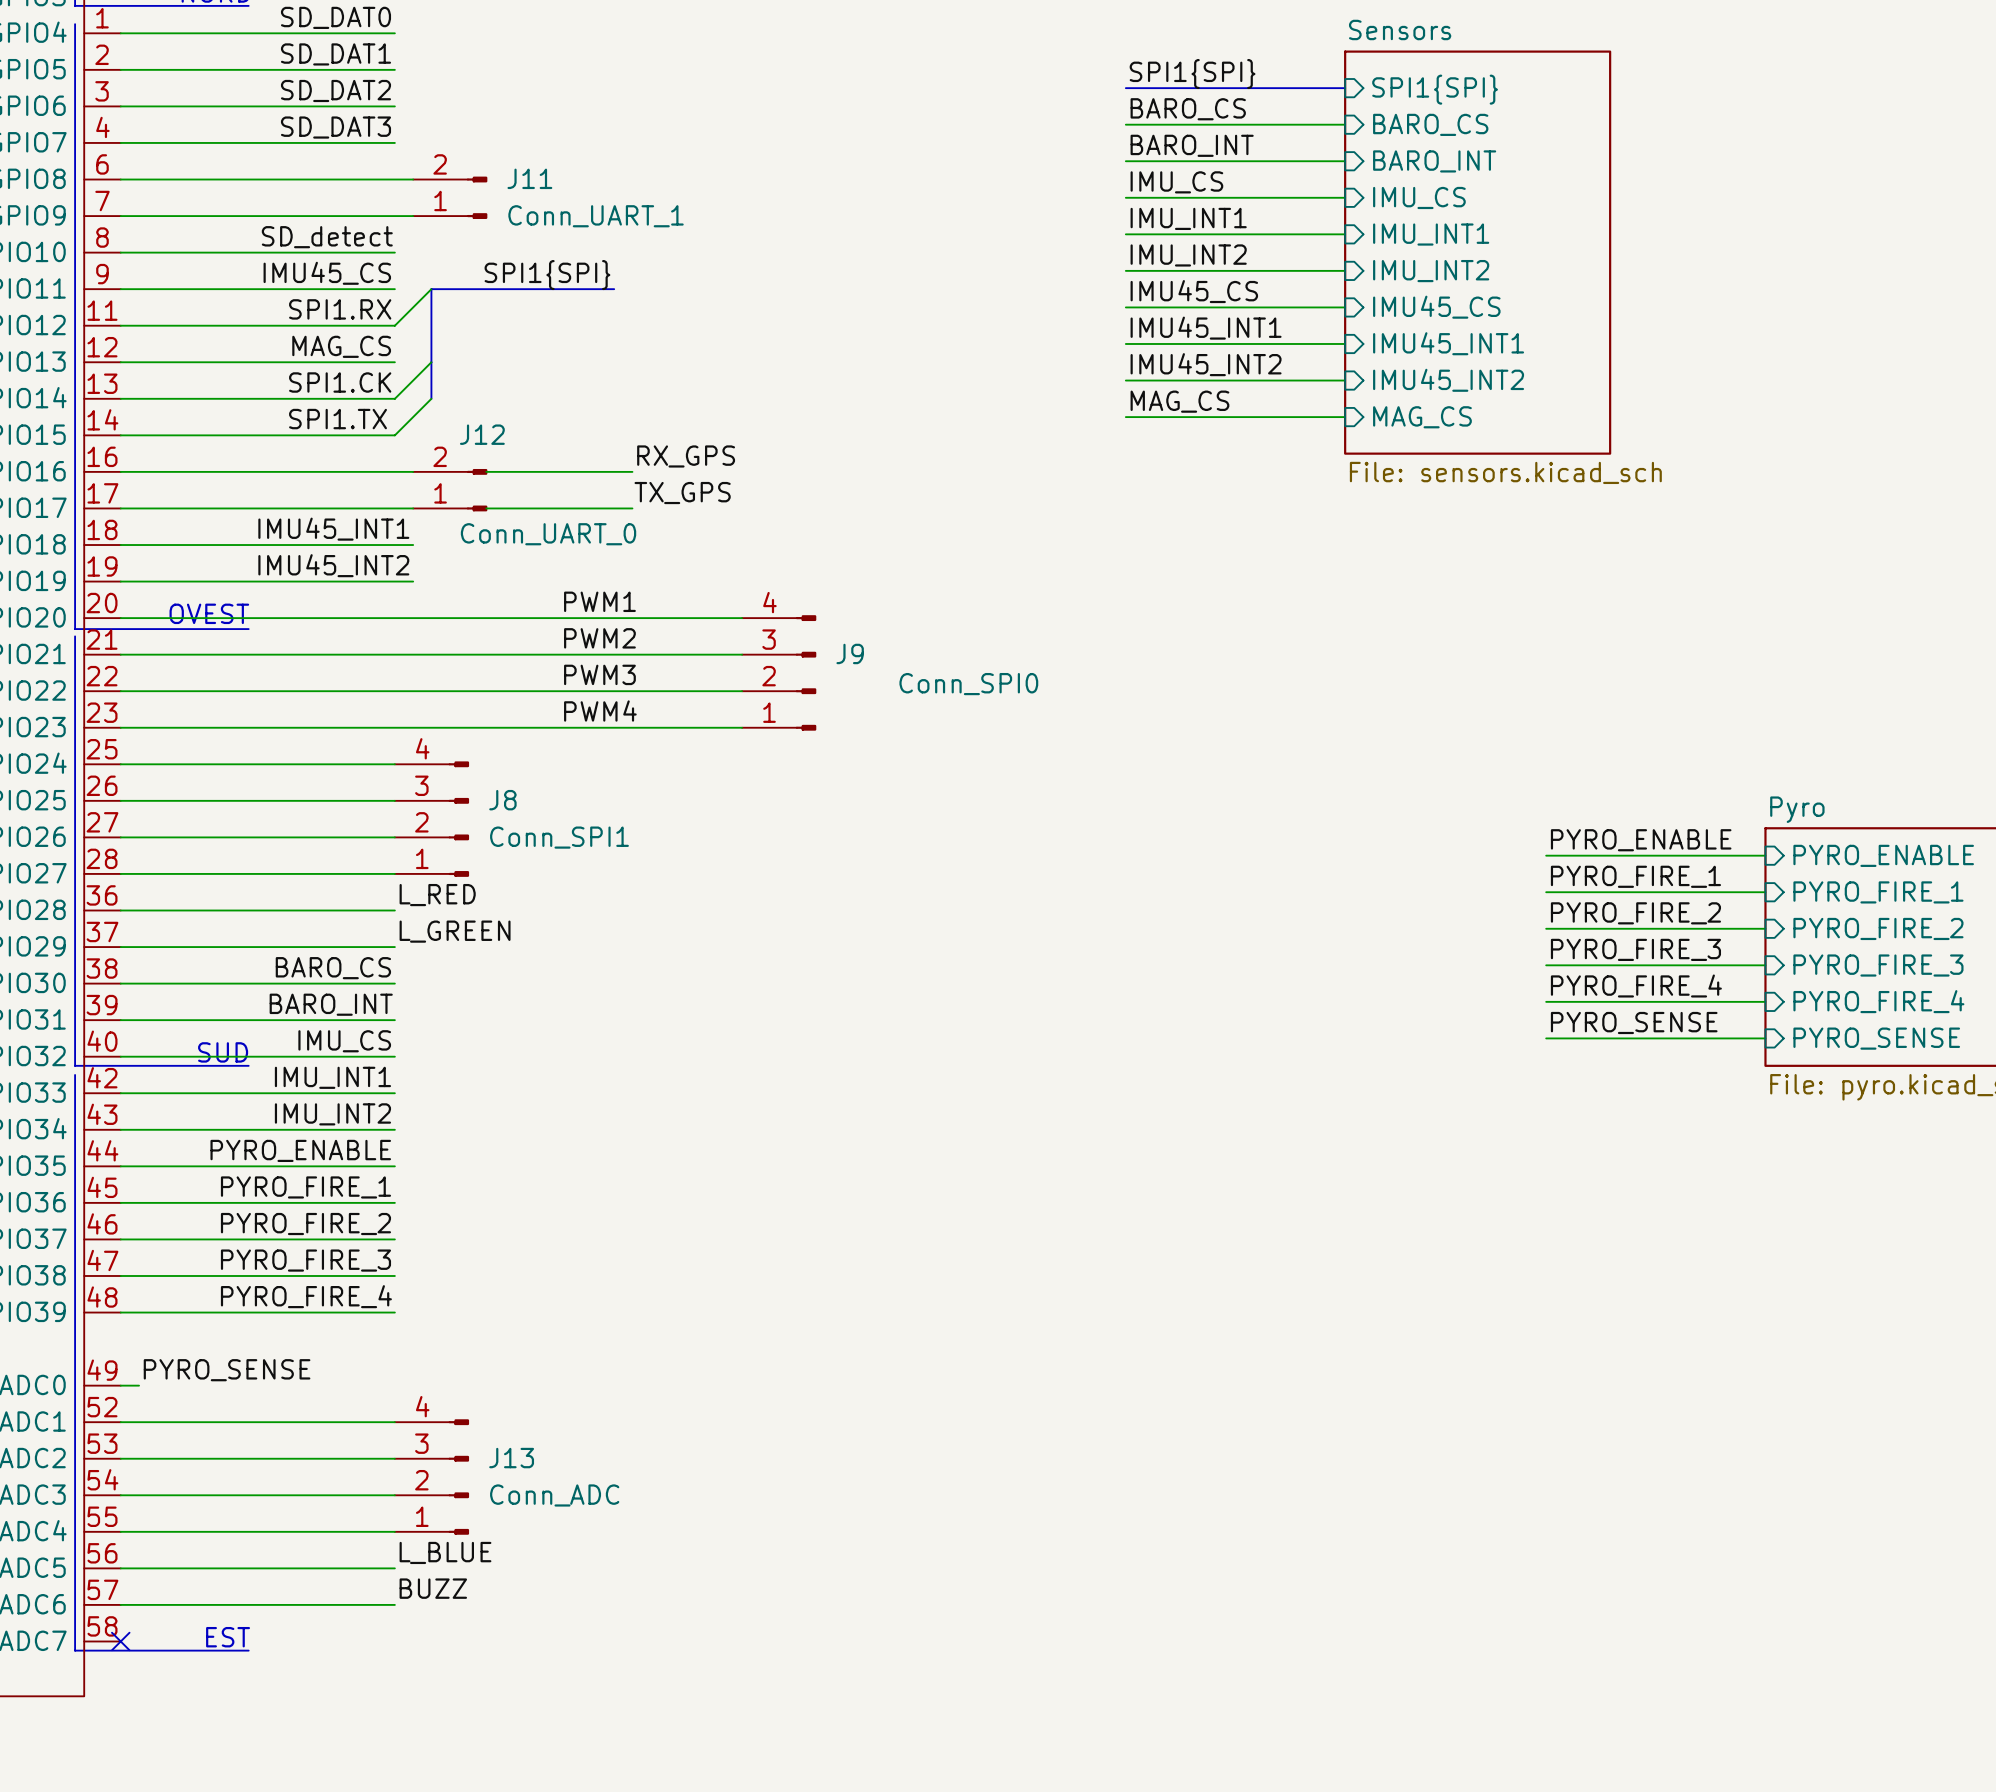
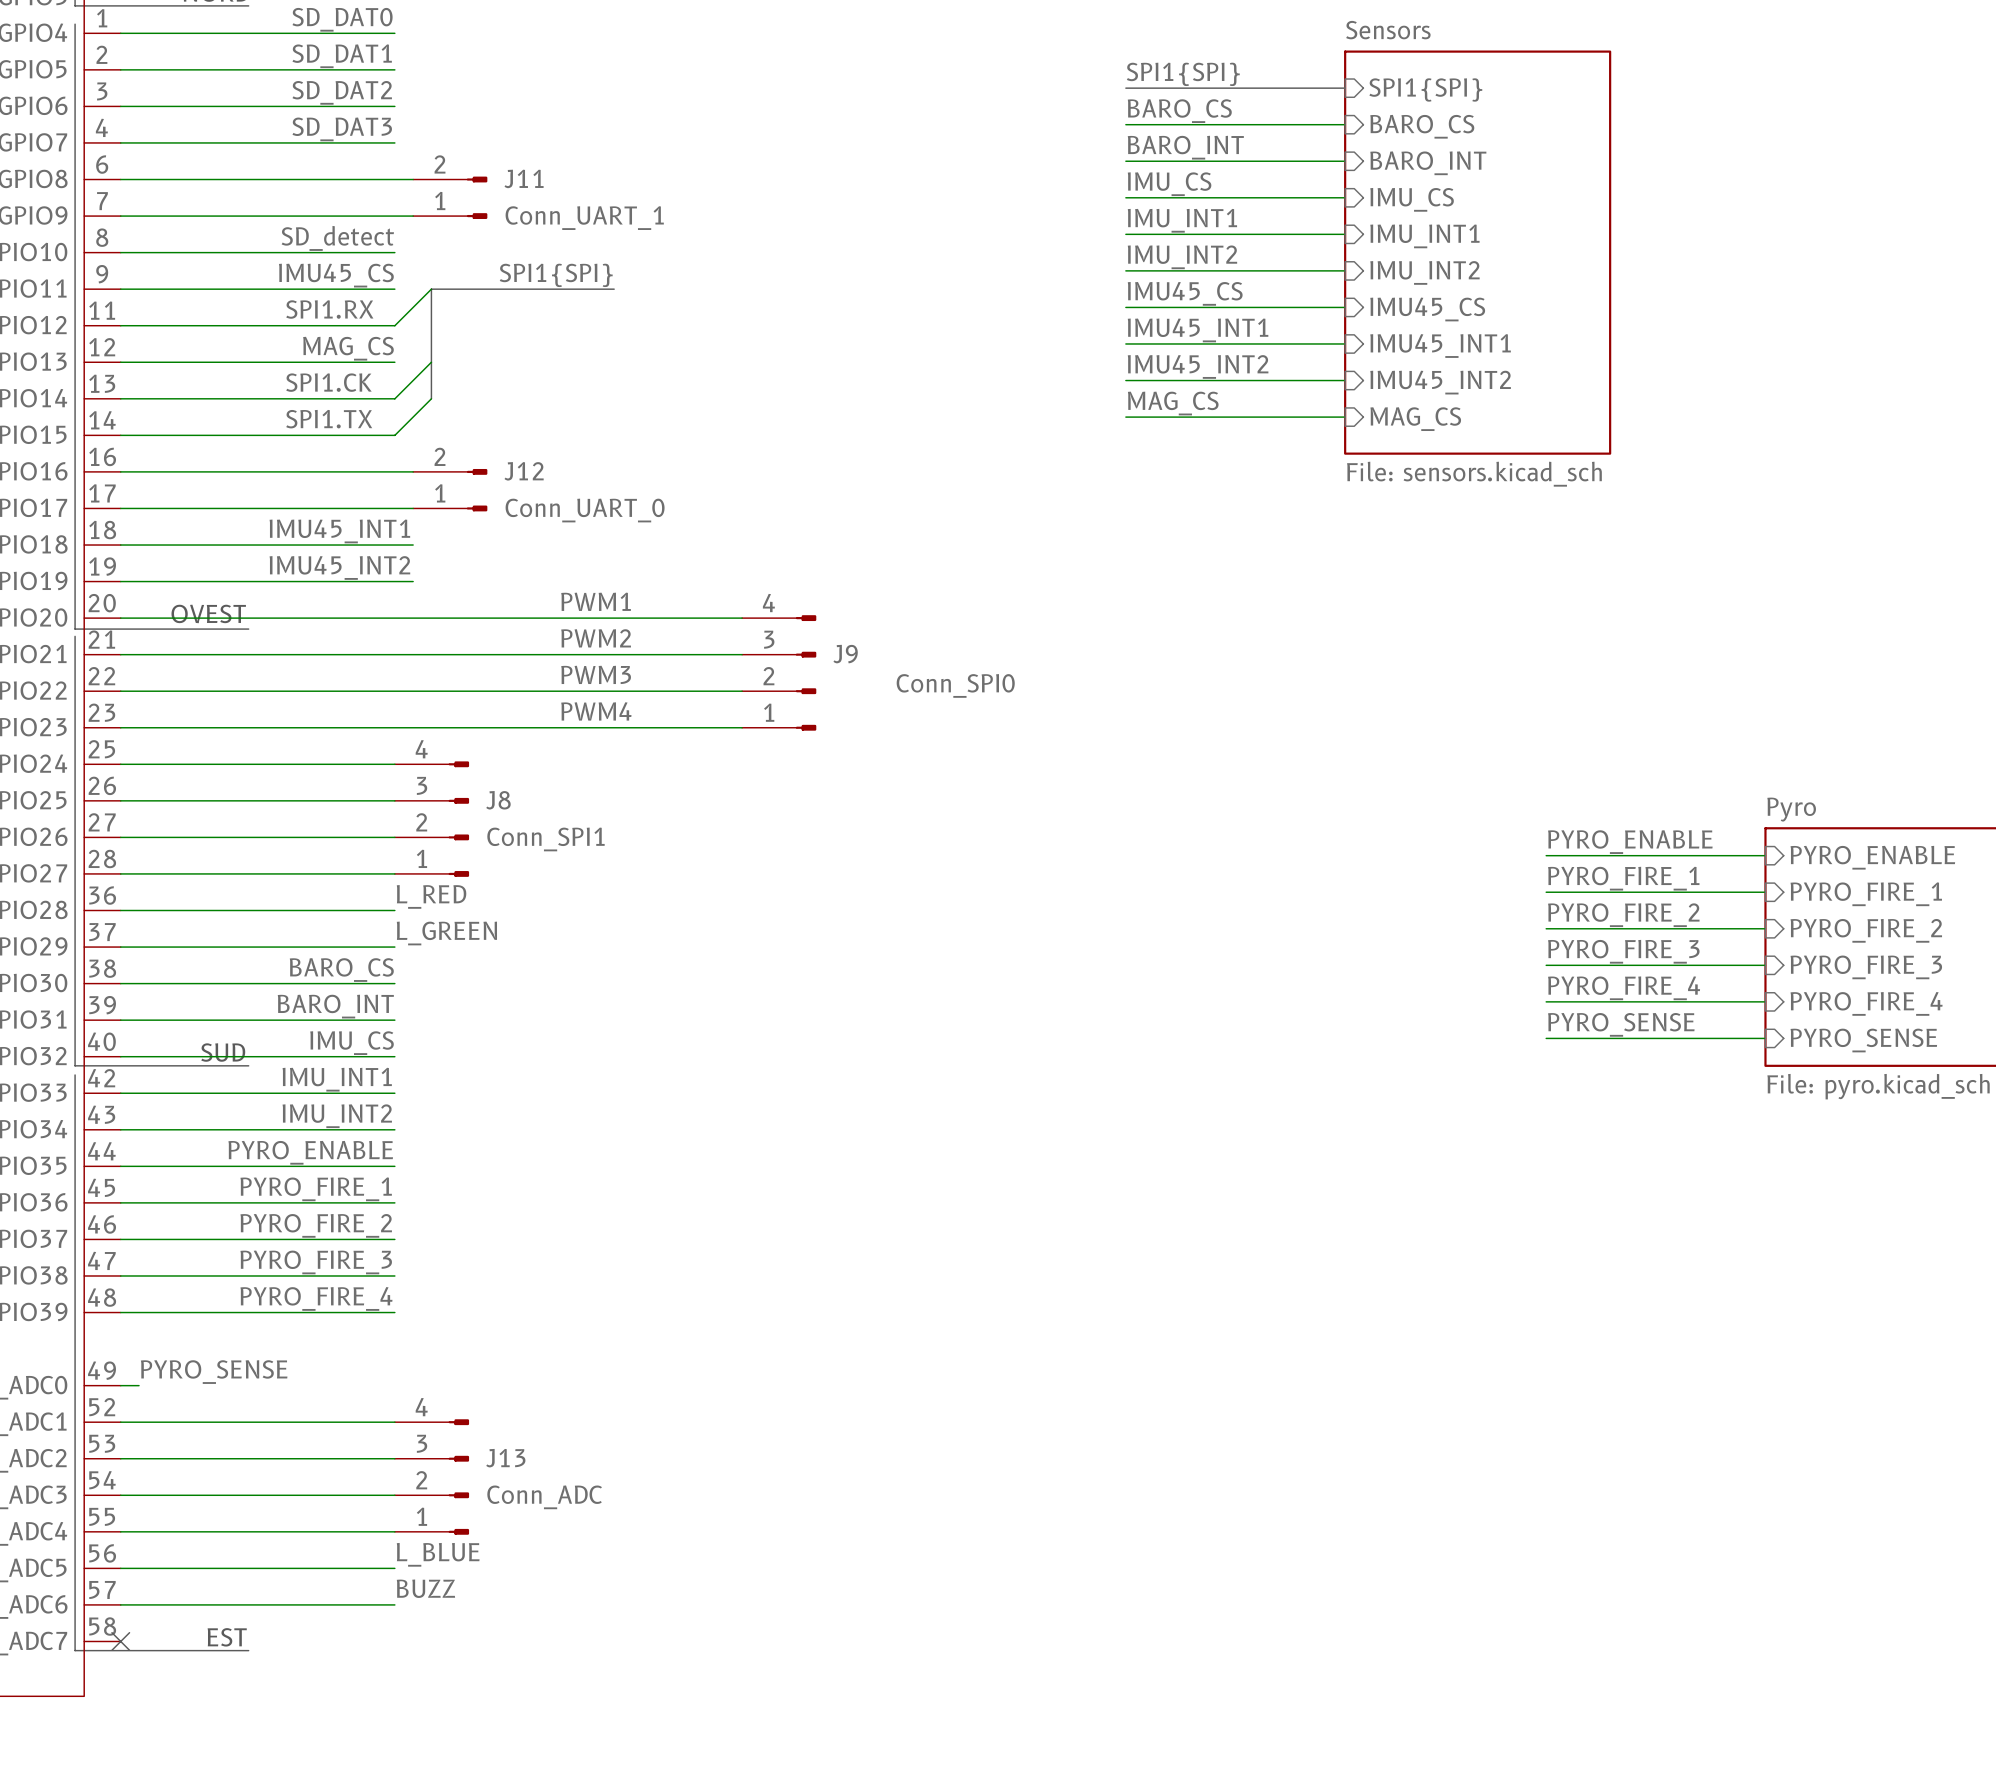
J12 name position: J12 (482, 434) -> J12 (524, 471)
label: RX_GPS (686, 456) -> none
wire: (486, 471) (632, 471) -> none
label: TX_GPS (682, 493) -> none
wire: (486, 508) (632, 508) -> none
J12 value position: Conn_UART_0 (548, 534) -> Conn_UART_0 (585, 510)

